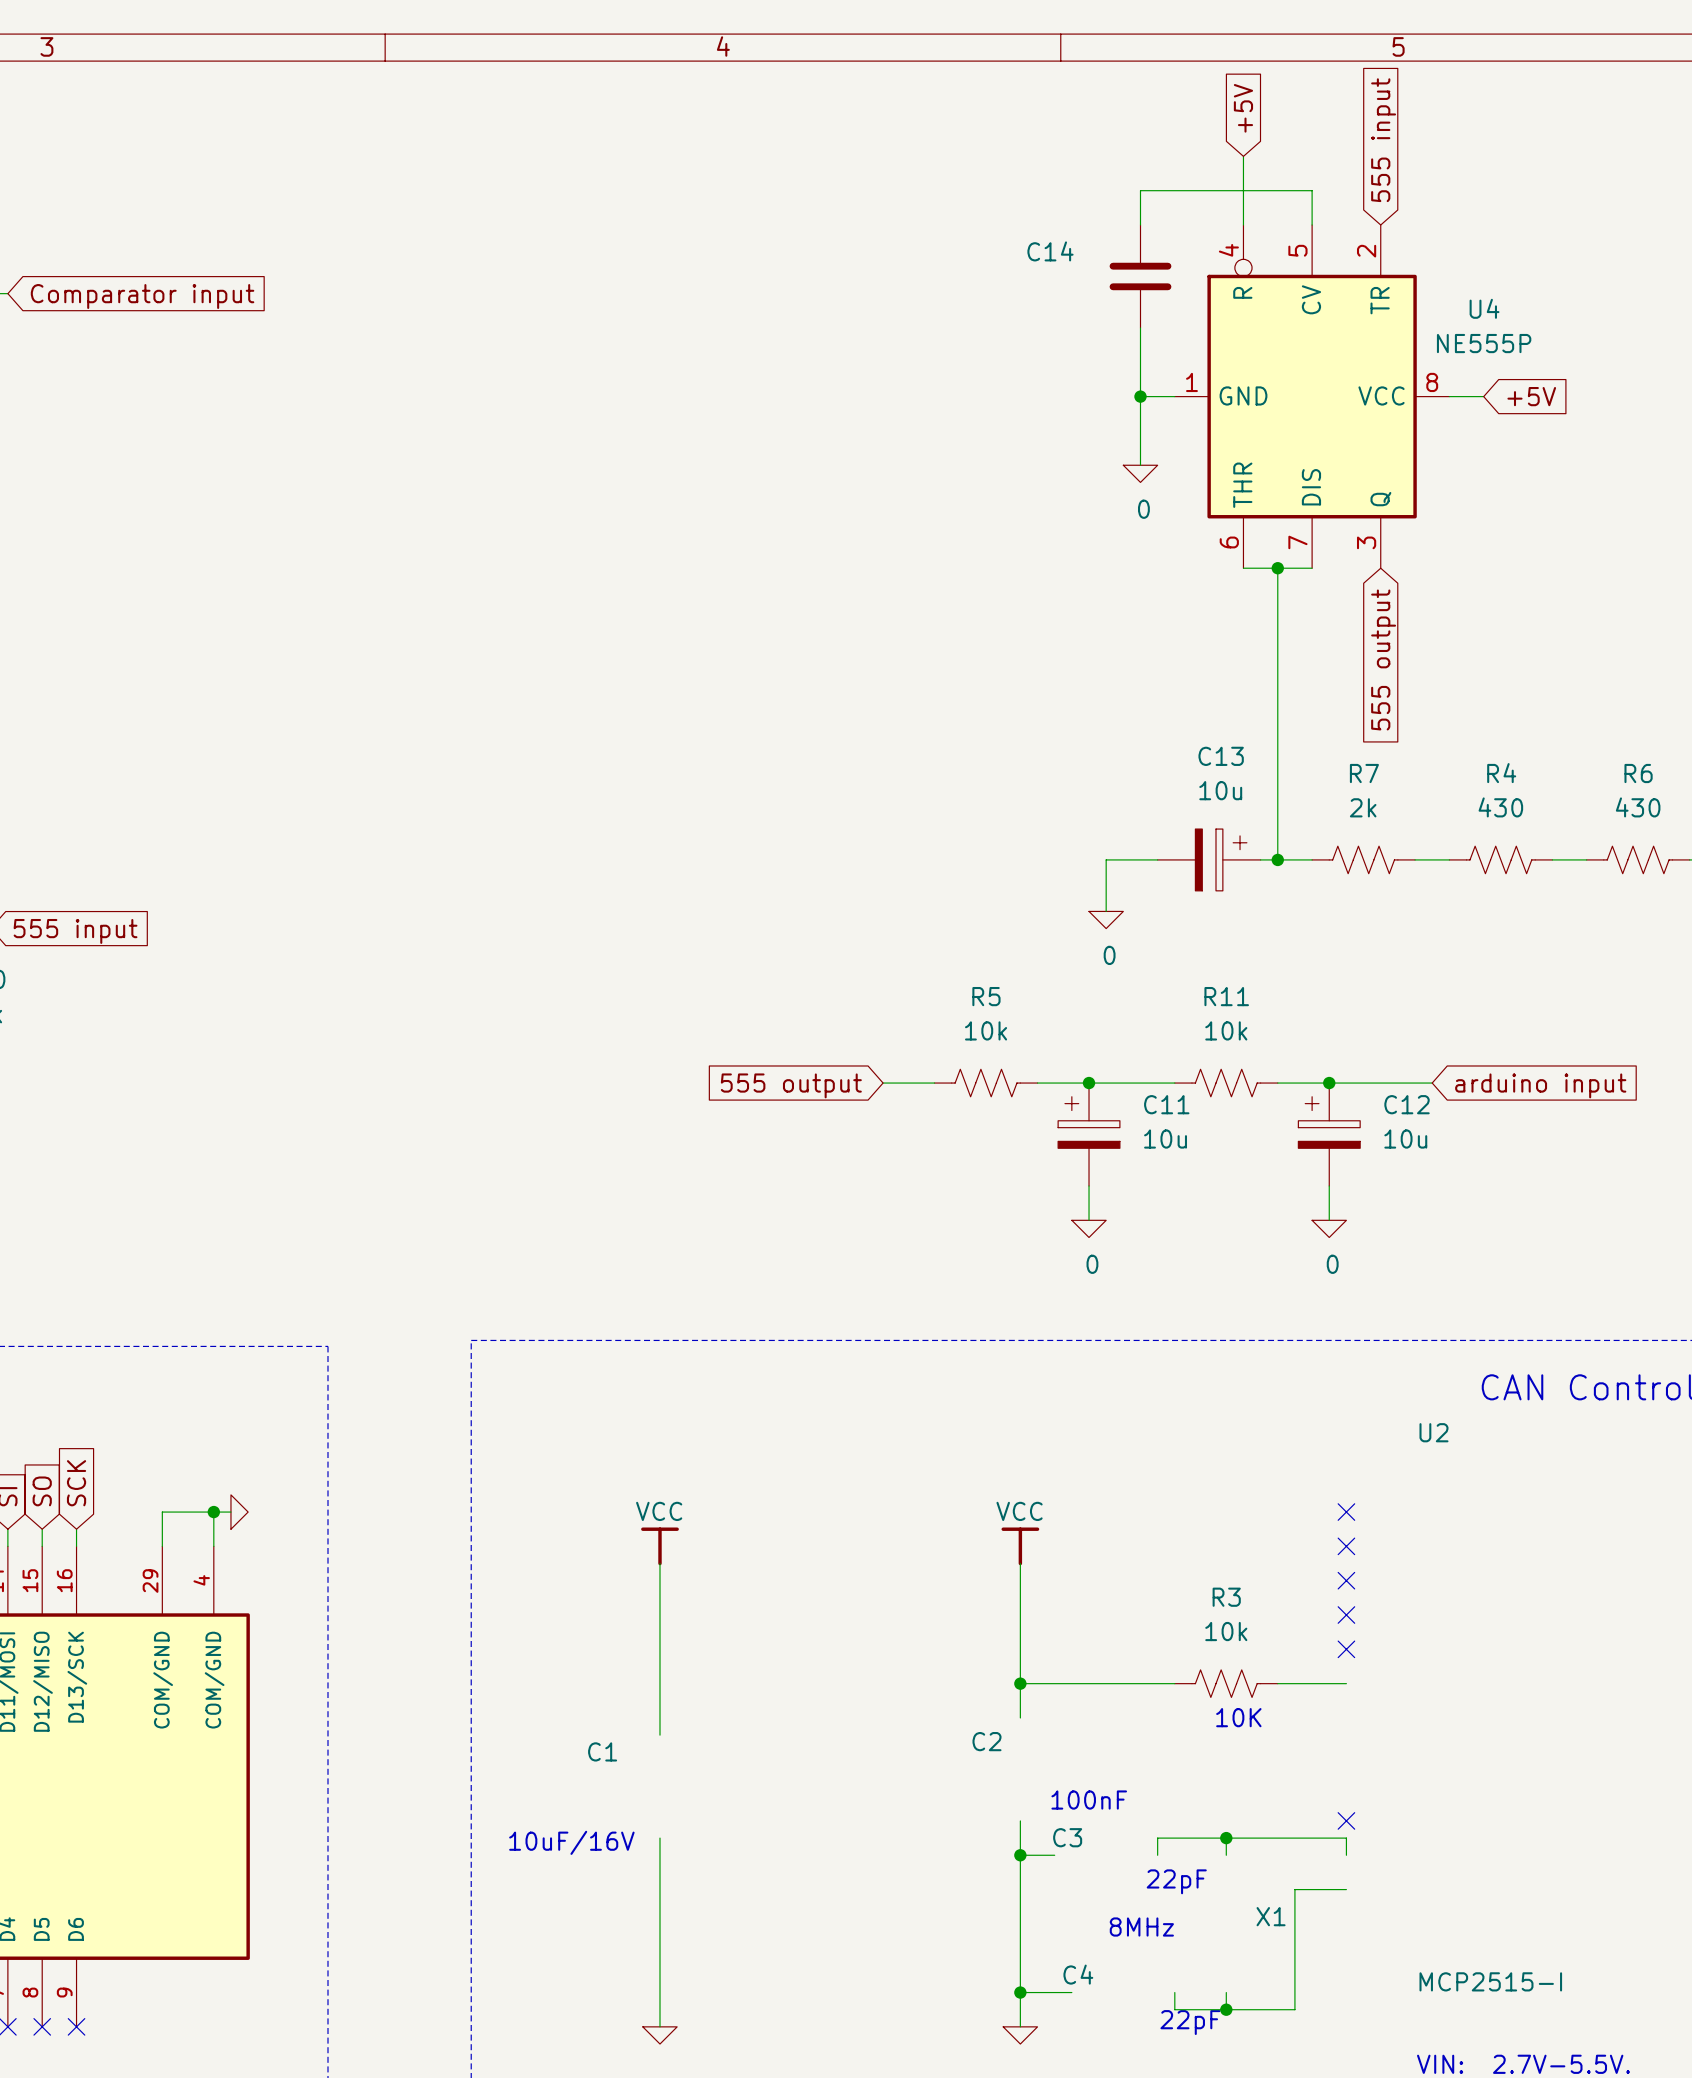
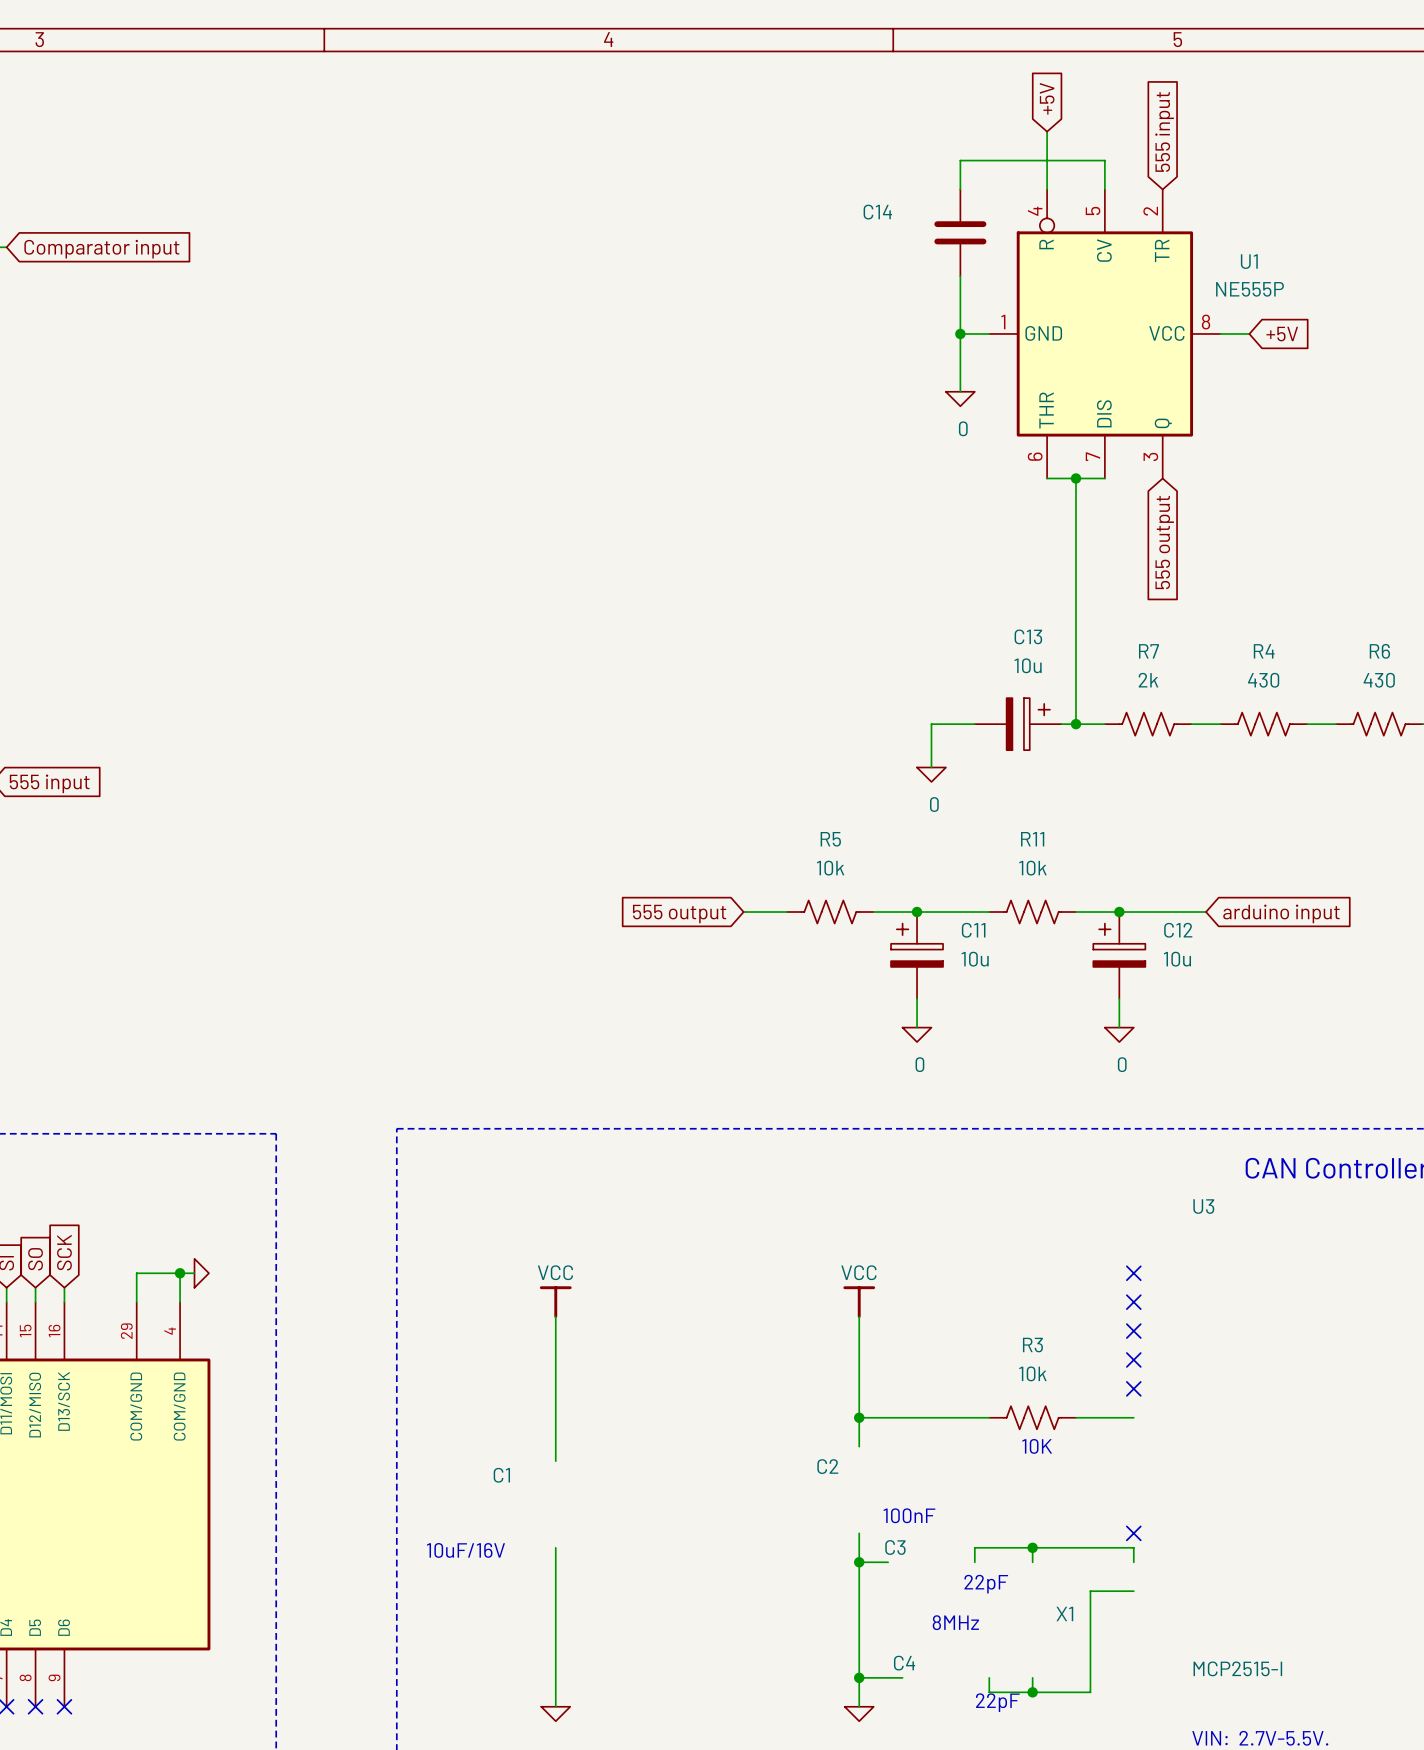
U4 name: U4 (1484, 308) -> U1 (1249, 261)
U2 name: U2 (1433, 1432) -> U3 (1203, 1206)

